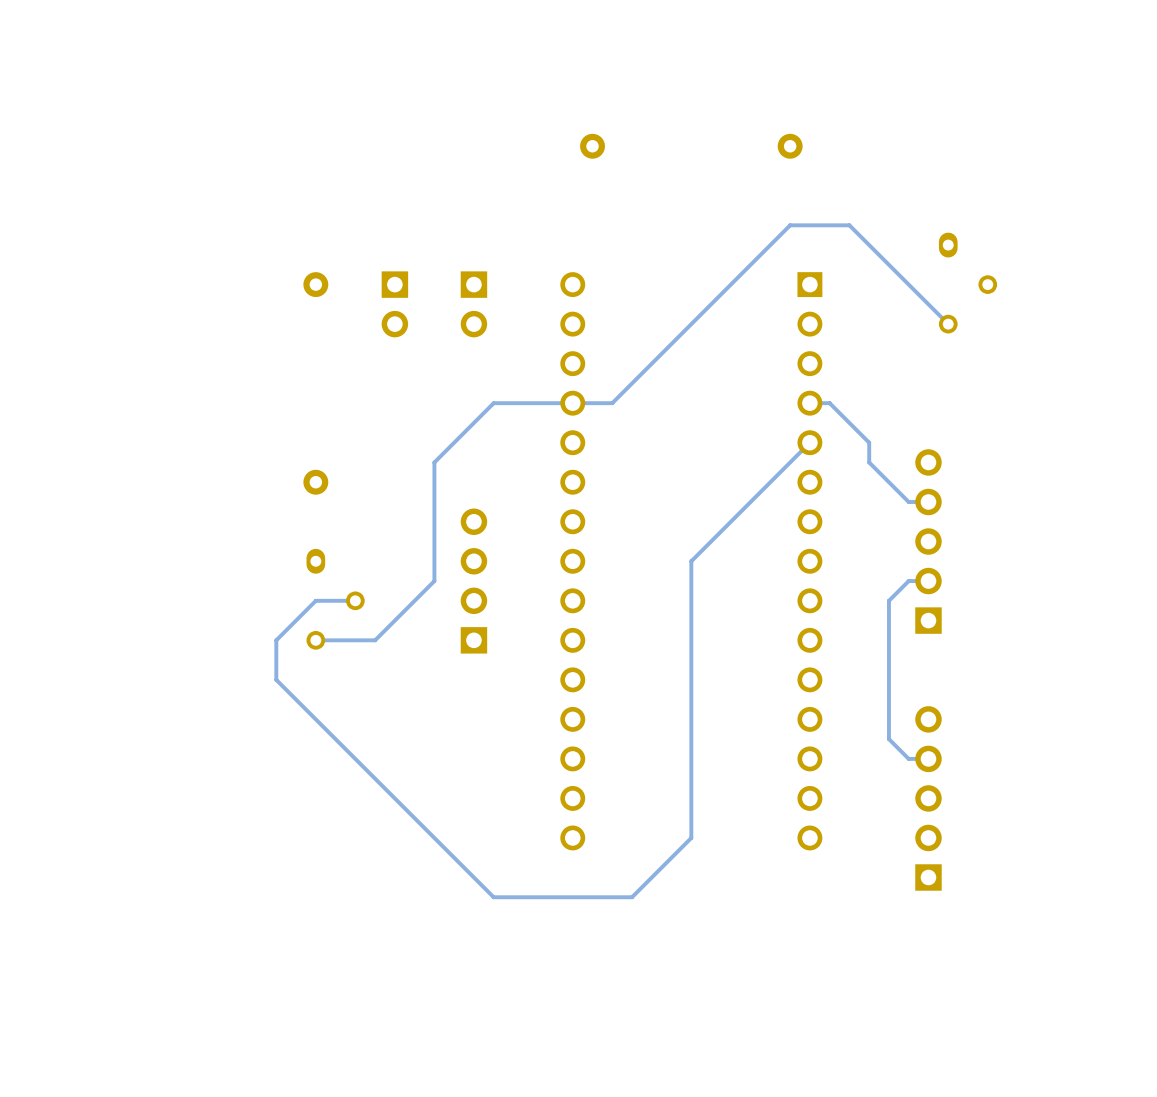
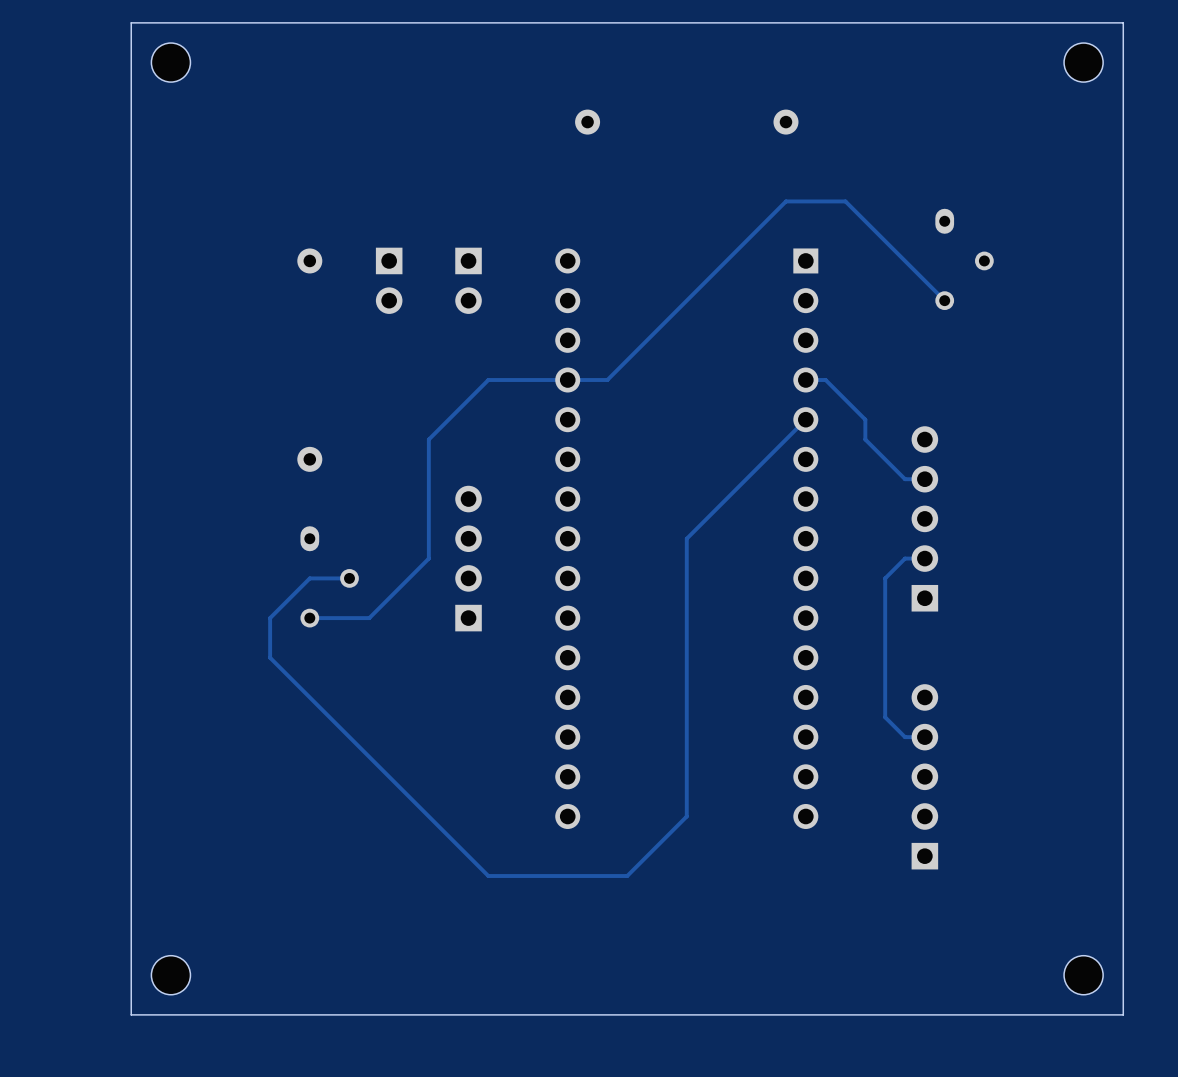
board edge: none -> (1123, 22) (131, 22) (131, 1014) (1123, 1014) (1123, 22)
part: none -> (170, 62)
part: none -> (1083, 62)
part: none -> (170, 975)
part: none -> (1083, 975)

